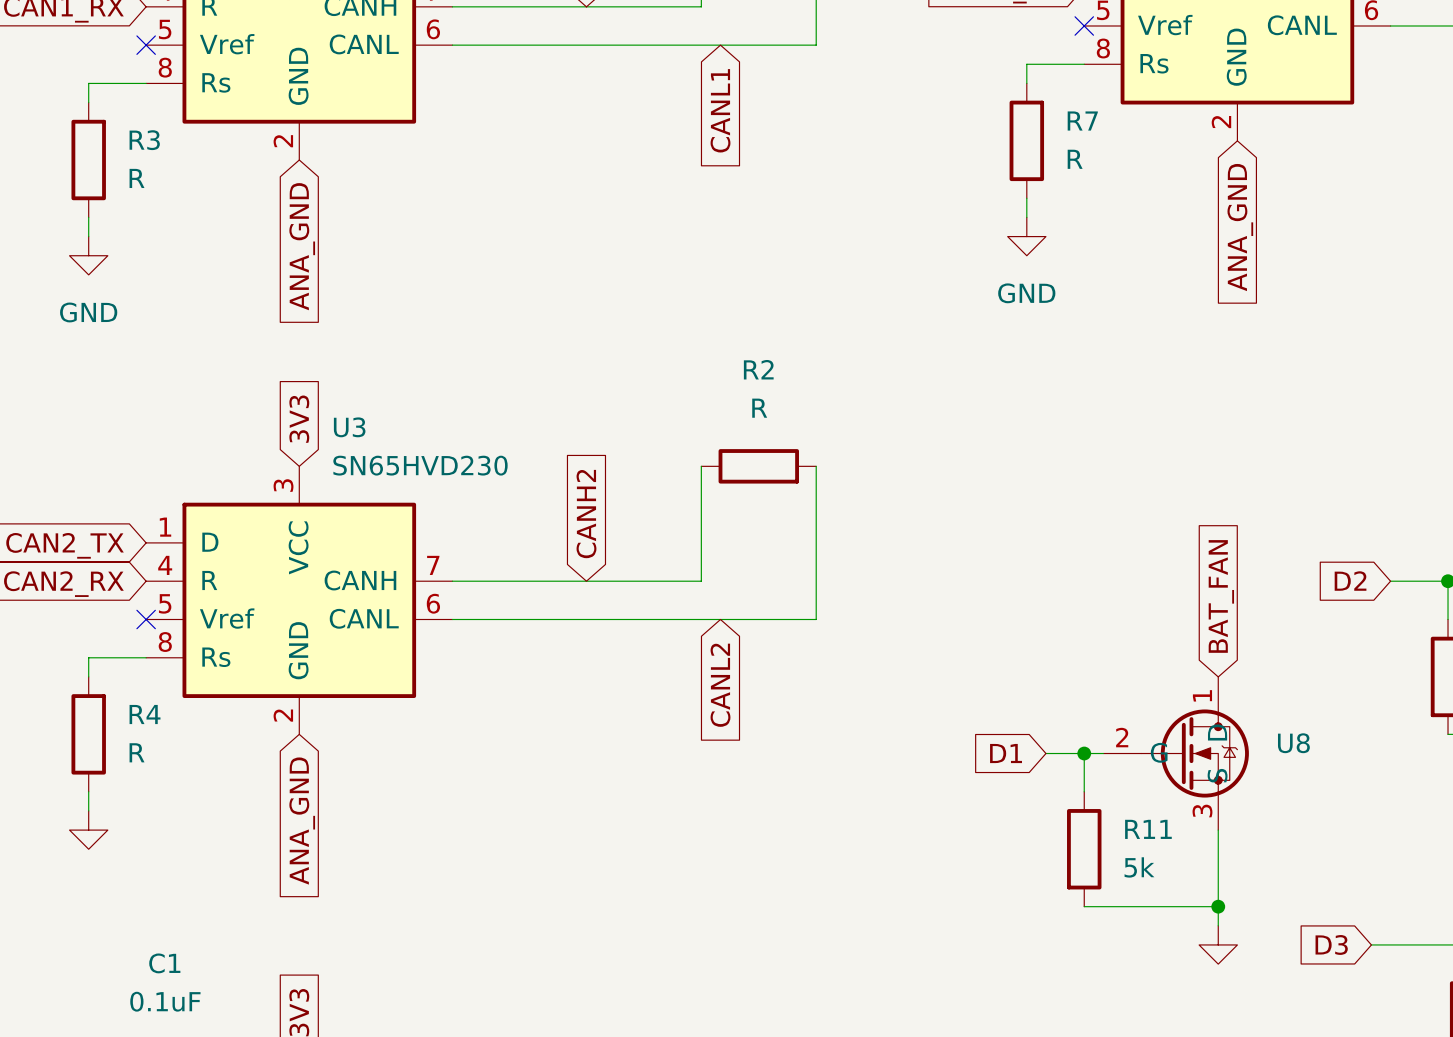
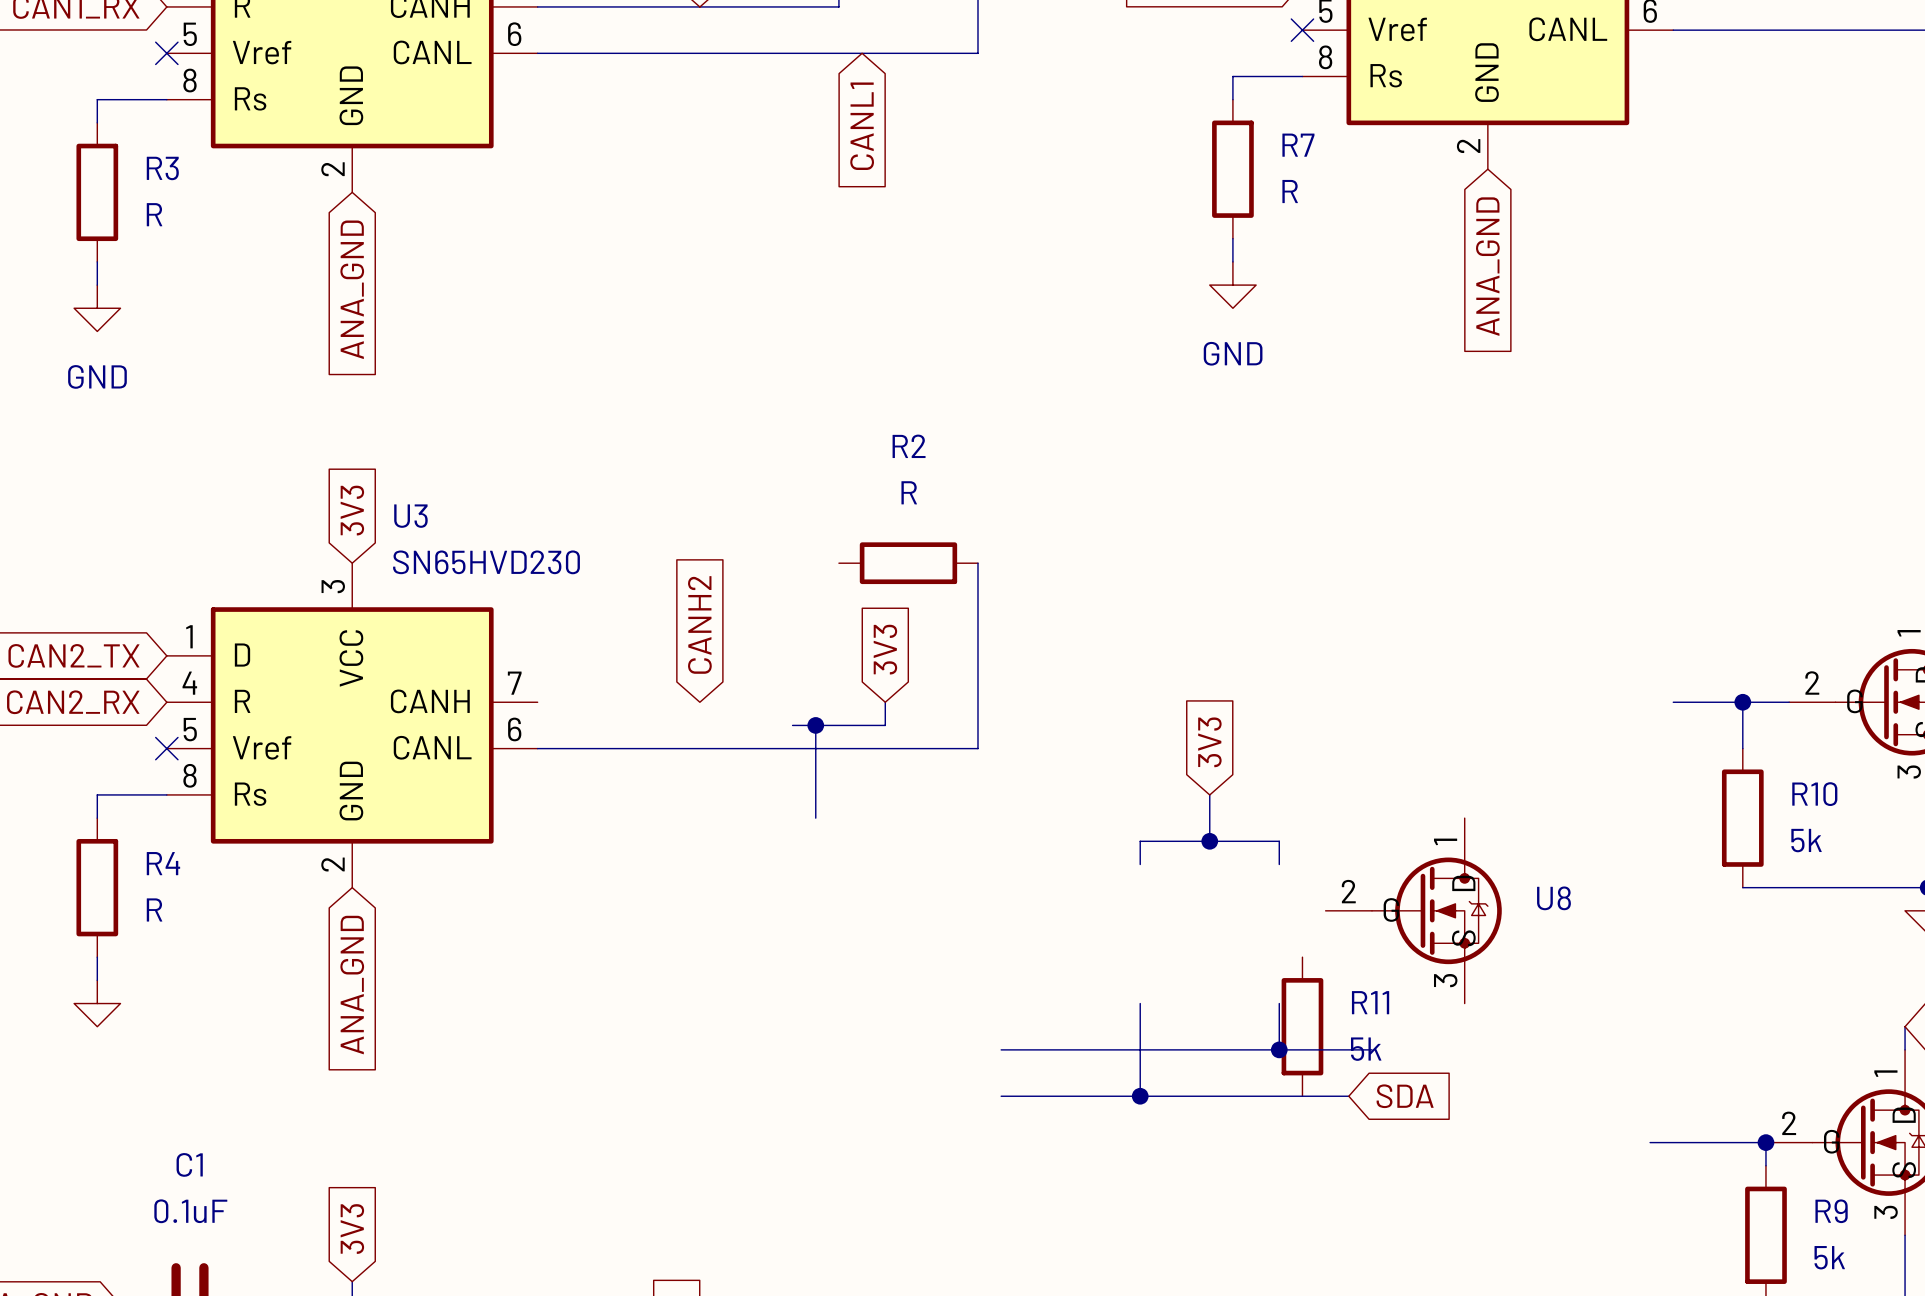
wire: (701, 466) (701, 581) (452, 581) -> none
global label: none -> 3V3 (885, 649)
wire: none -> (885, 702) (885, 725) (792, 725)
global label: D2 (1350, 581) -> none
global label: BAT_FAN (1221, 596) -> none
wire: none -> (815, 725) (815, 818)
junction: none -> (815, 725)
global label: none -> 3V3 (1209, 742)
wire: none -> (1209, 794) (1209, 841)
global label: CANL2 (720, 685) -> none
junction: none -> (1209, 841)
wire: none -> (1140, 864) (1140, 841) (1279, 841) (1279, 864)
global label: D1 (1006, 753) -> none
wire: (1045, 753) (1103, 753) -> none
wire: (1084, 753) (1084, 791) -> (1279, 1003) (1279, 1049)
junction: (1084, 753) -> none
wire: none -> (1140, 1003) (1140, 1096)
wire: (1218, 830) (1218, 925) -> none
wire: none -> (1001, 1049) (1371, 1049)
junction: none -> (1279, 1049)
wire: none -> (1001, 1096) (1302, 1096)
junction: none -> (1140, 1096)
wire: (1122, 906) (1218, 906) -> none
global label: none -> SDA (1405, 1096)
junction: (1218, 906) -> none
power symbol: (1218, 944) -> none
global label: D3 (1331, 944) -> none

